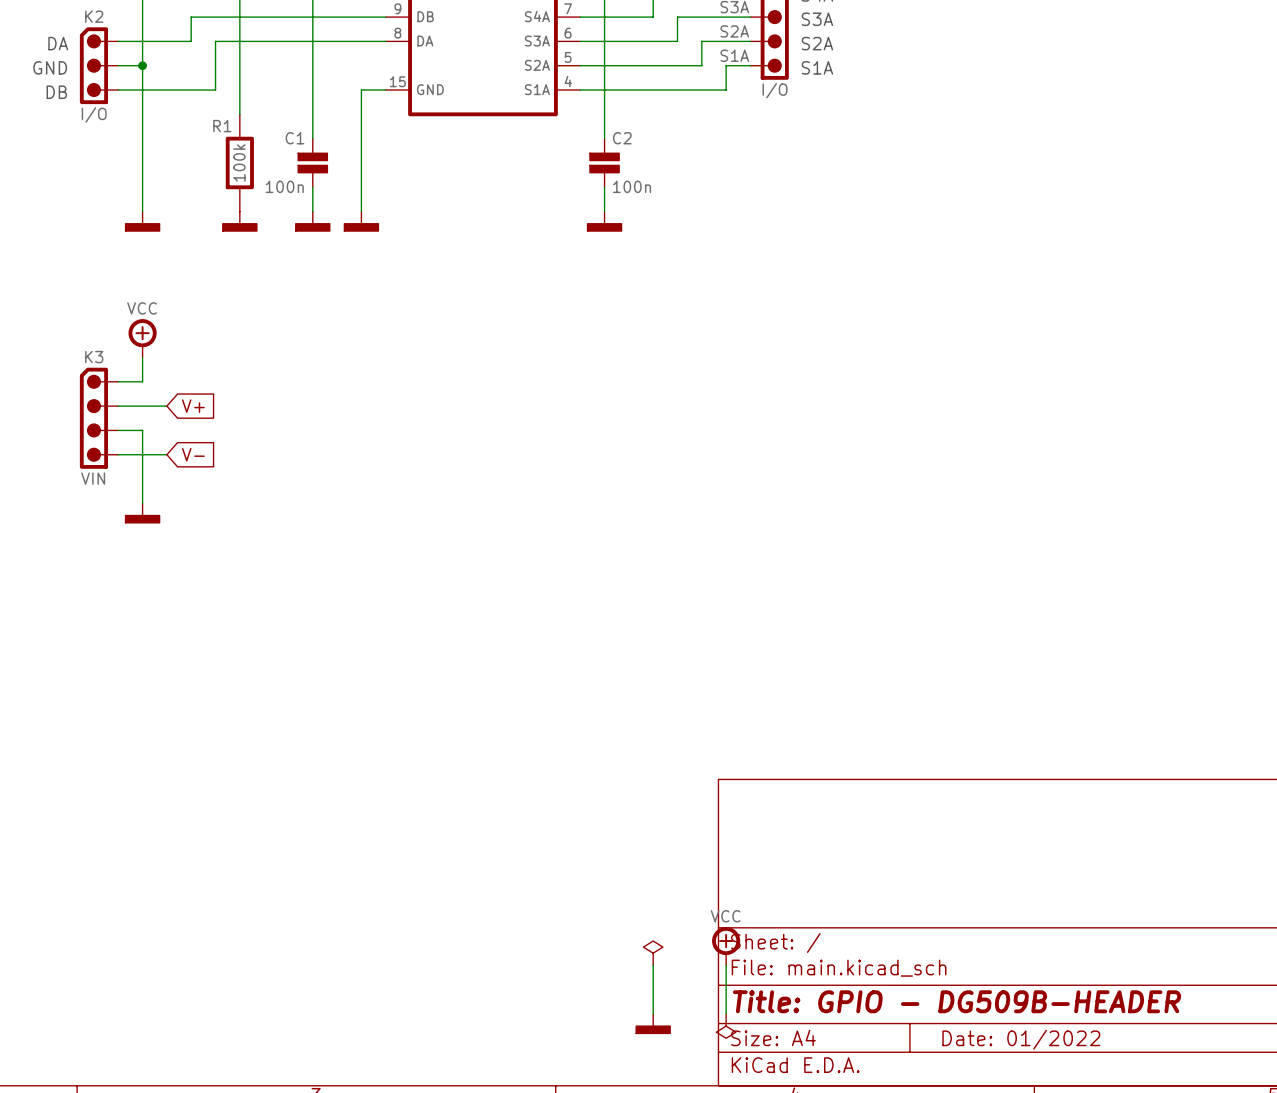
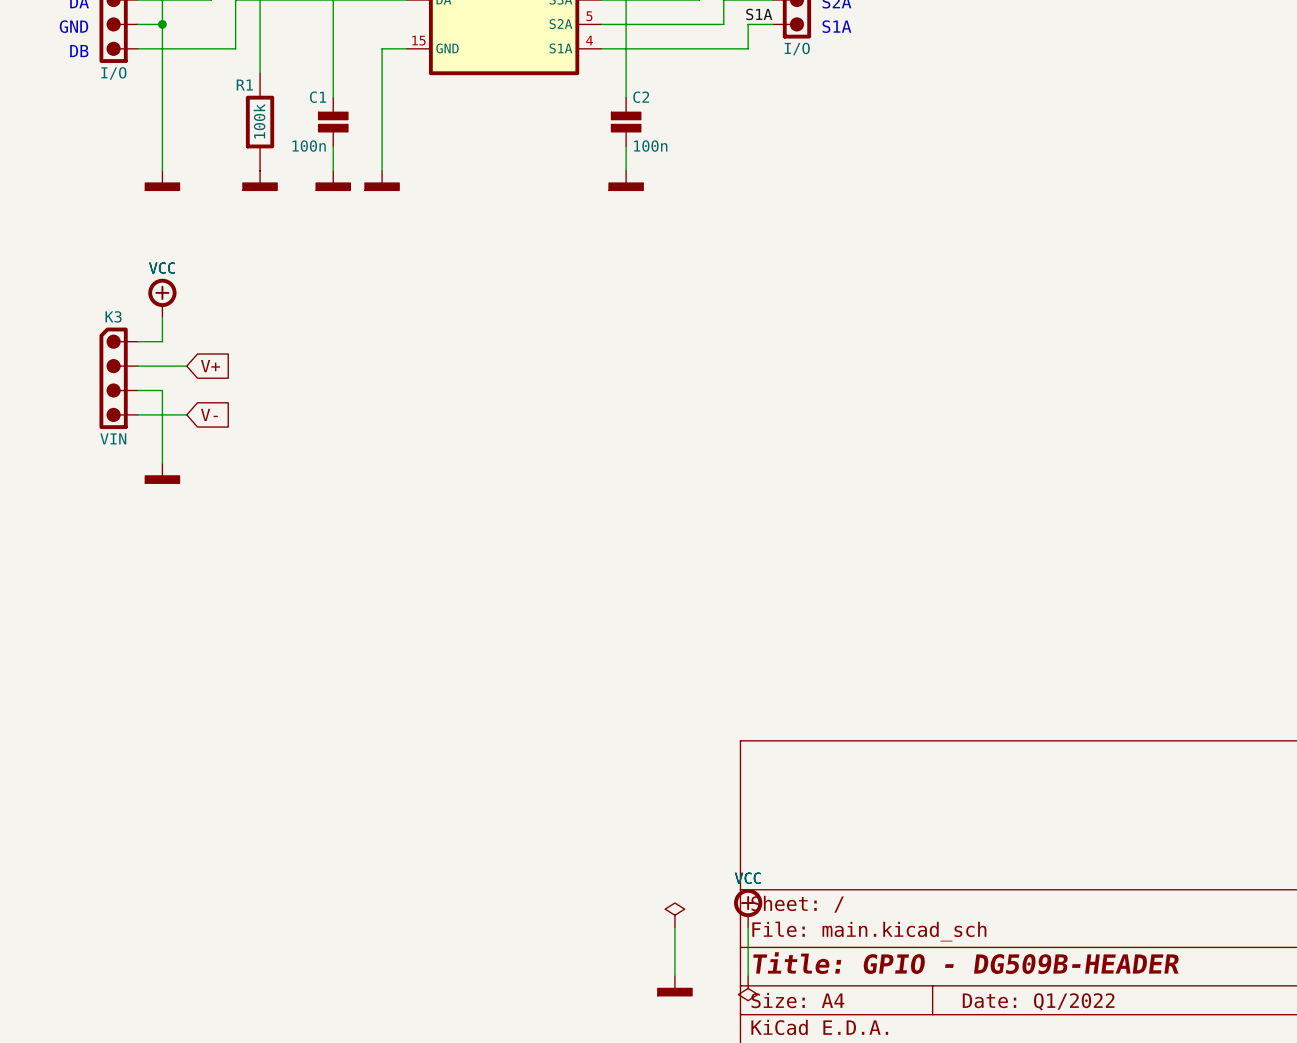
power symbol text: none -> VCC (162, 268)
power symbol text: none -> VCC (747, 878)
title block: Date: 01/2022 (1021, 1039) -> Date: Q1/2022 (1038, 1001)

